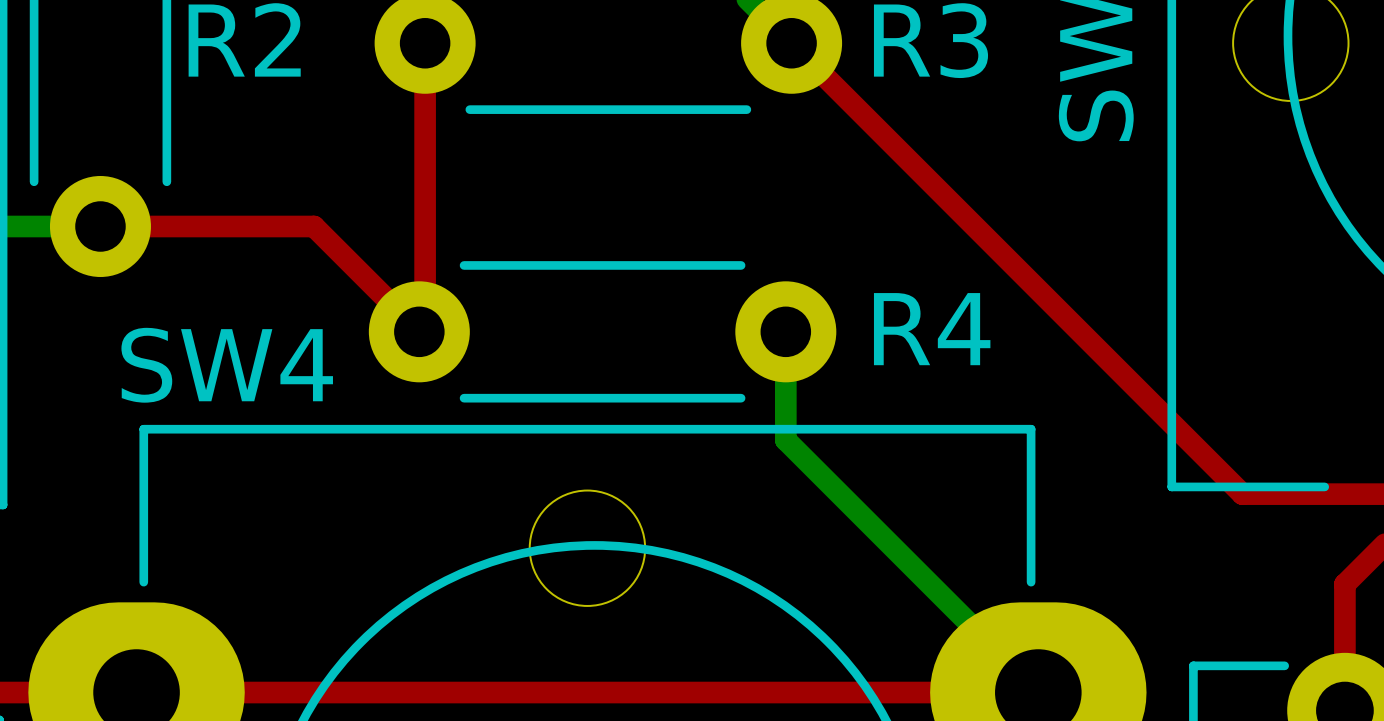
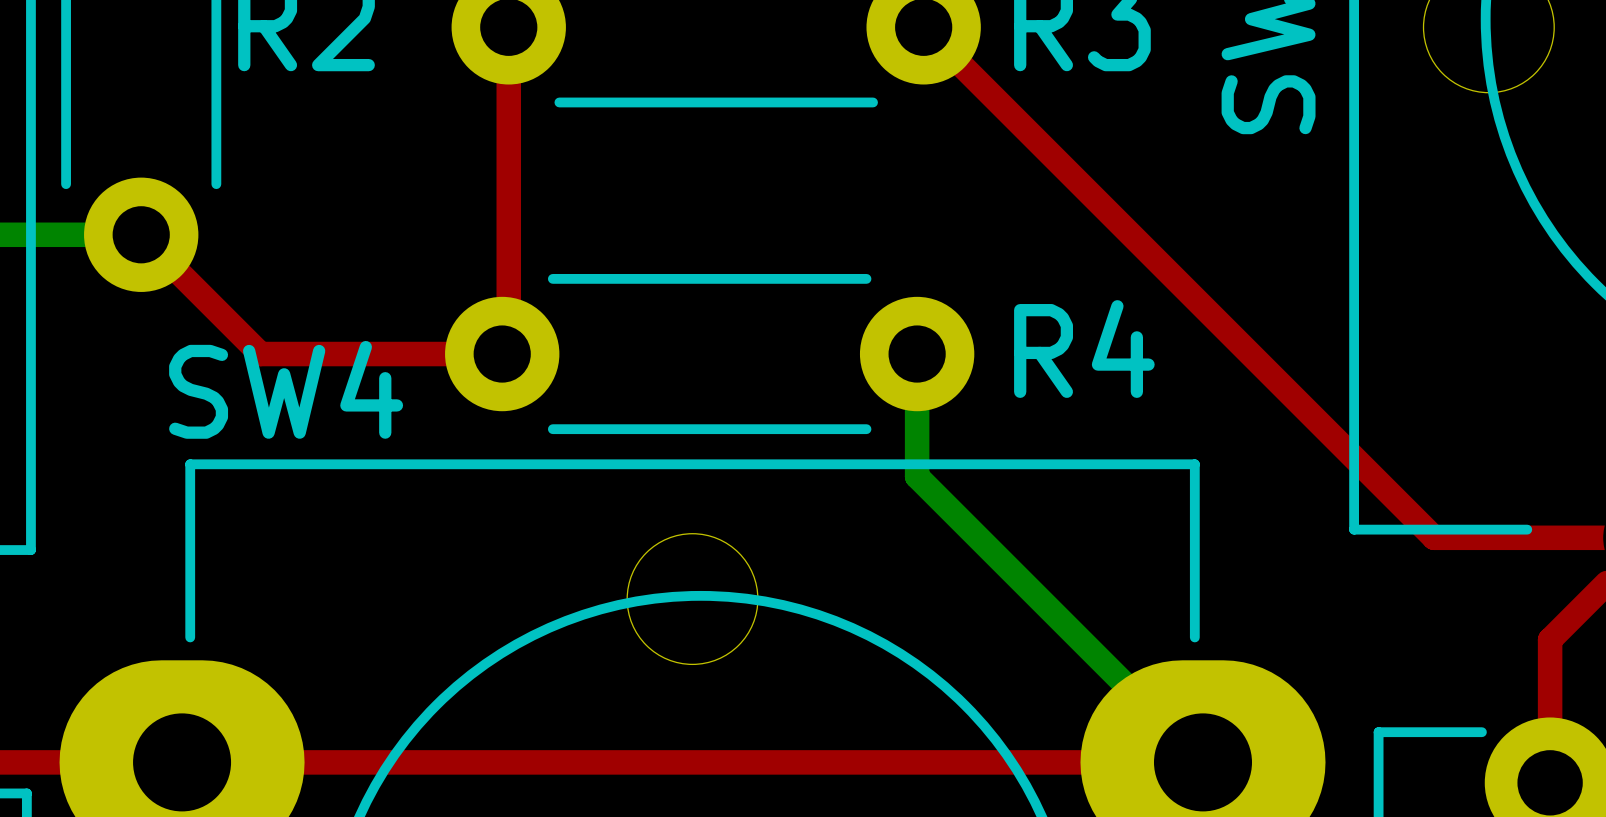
top track: (100, 226) (314, 226) (419, 331) -> (141, 234) (260, 354) (502, 354)

